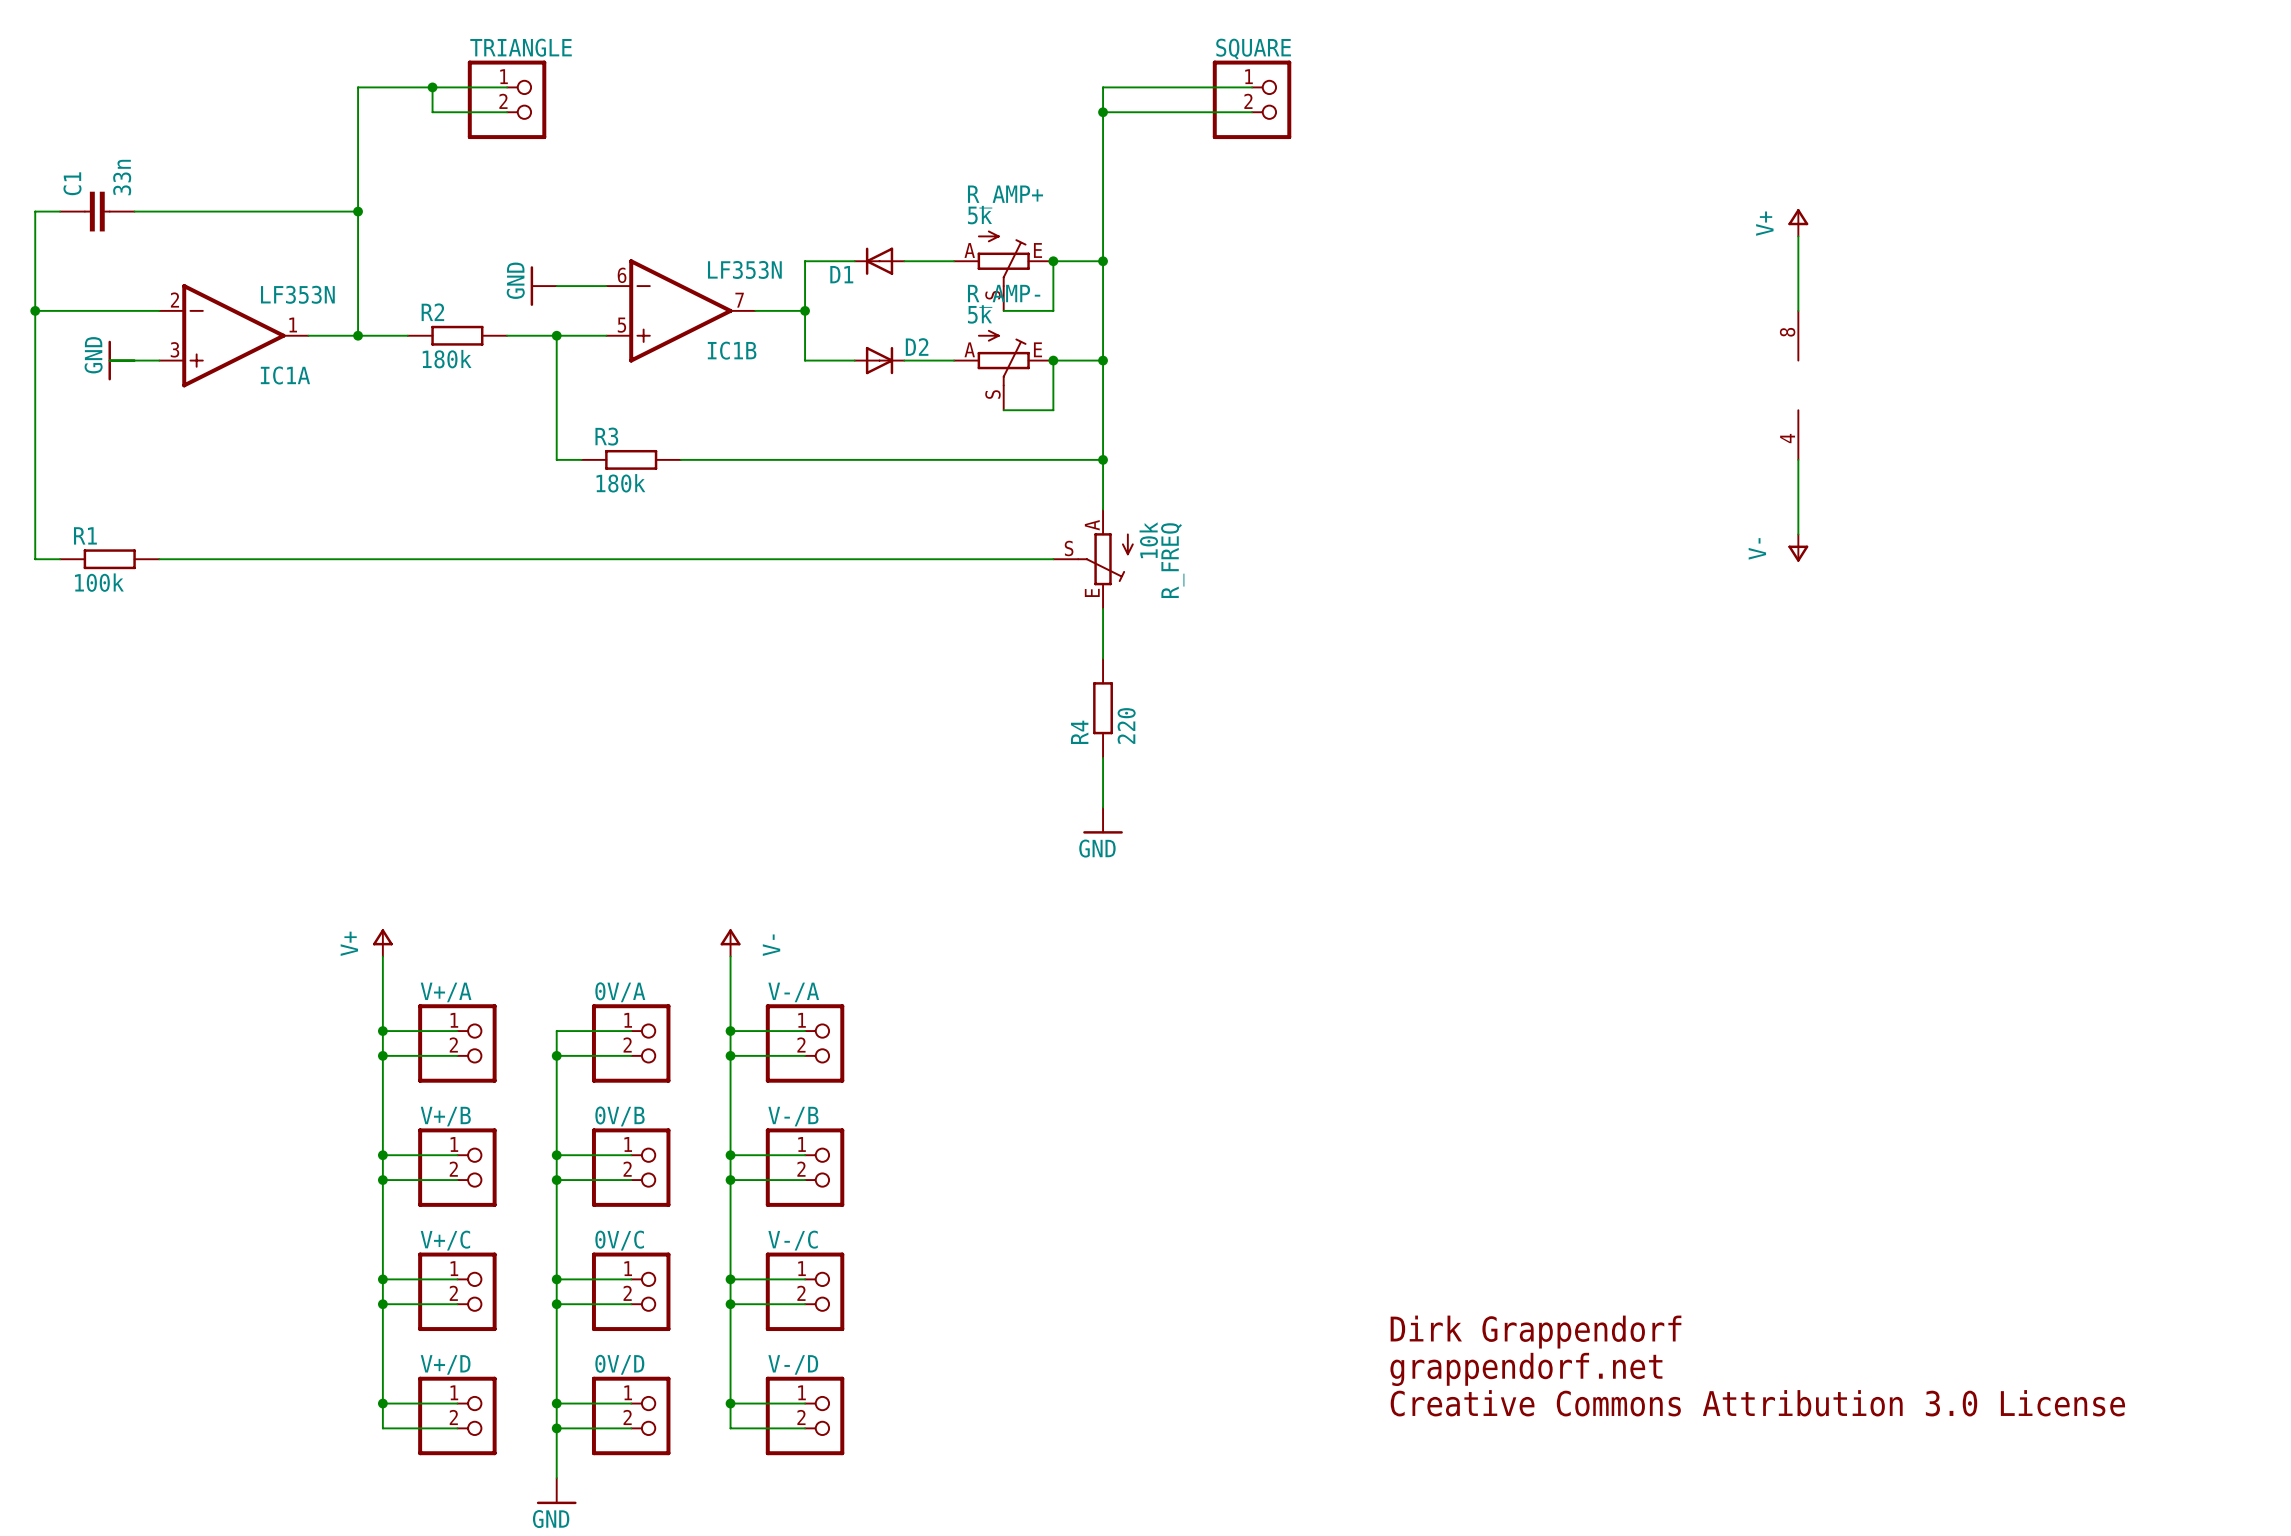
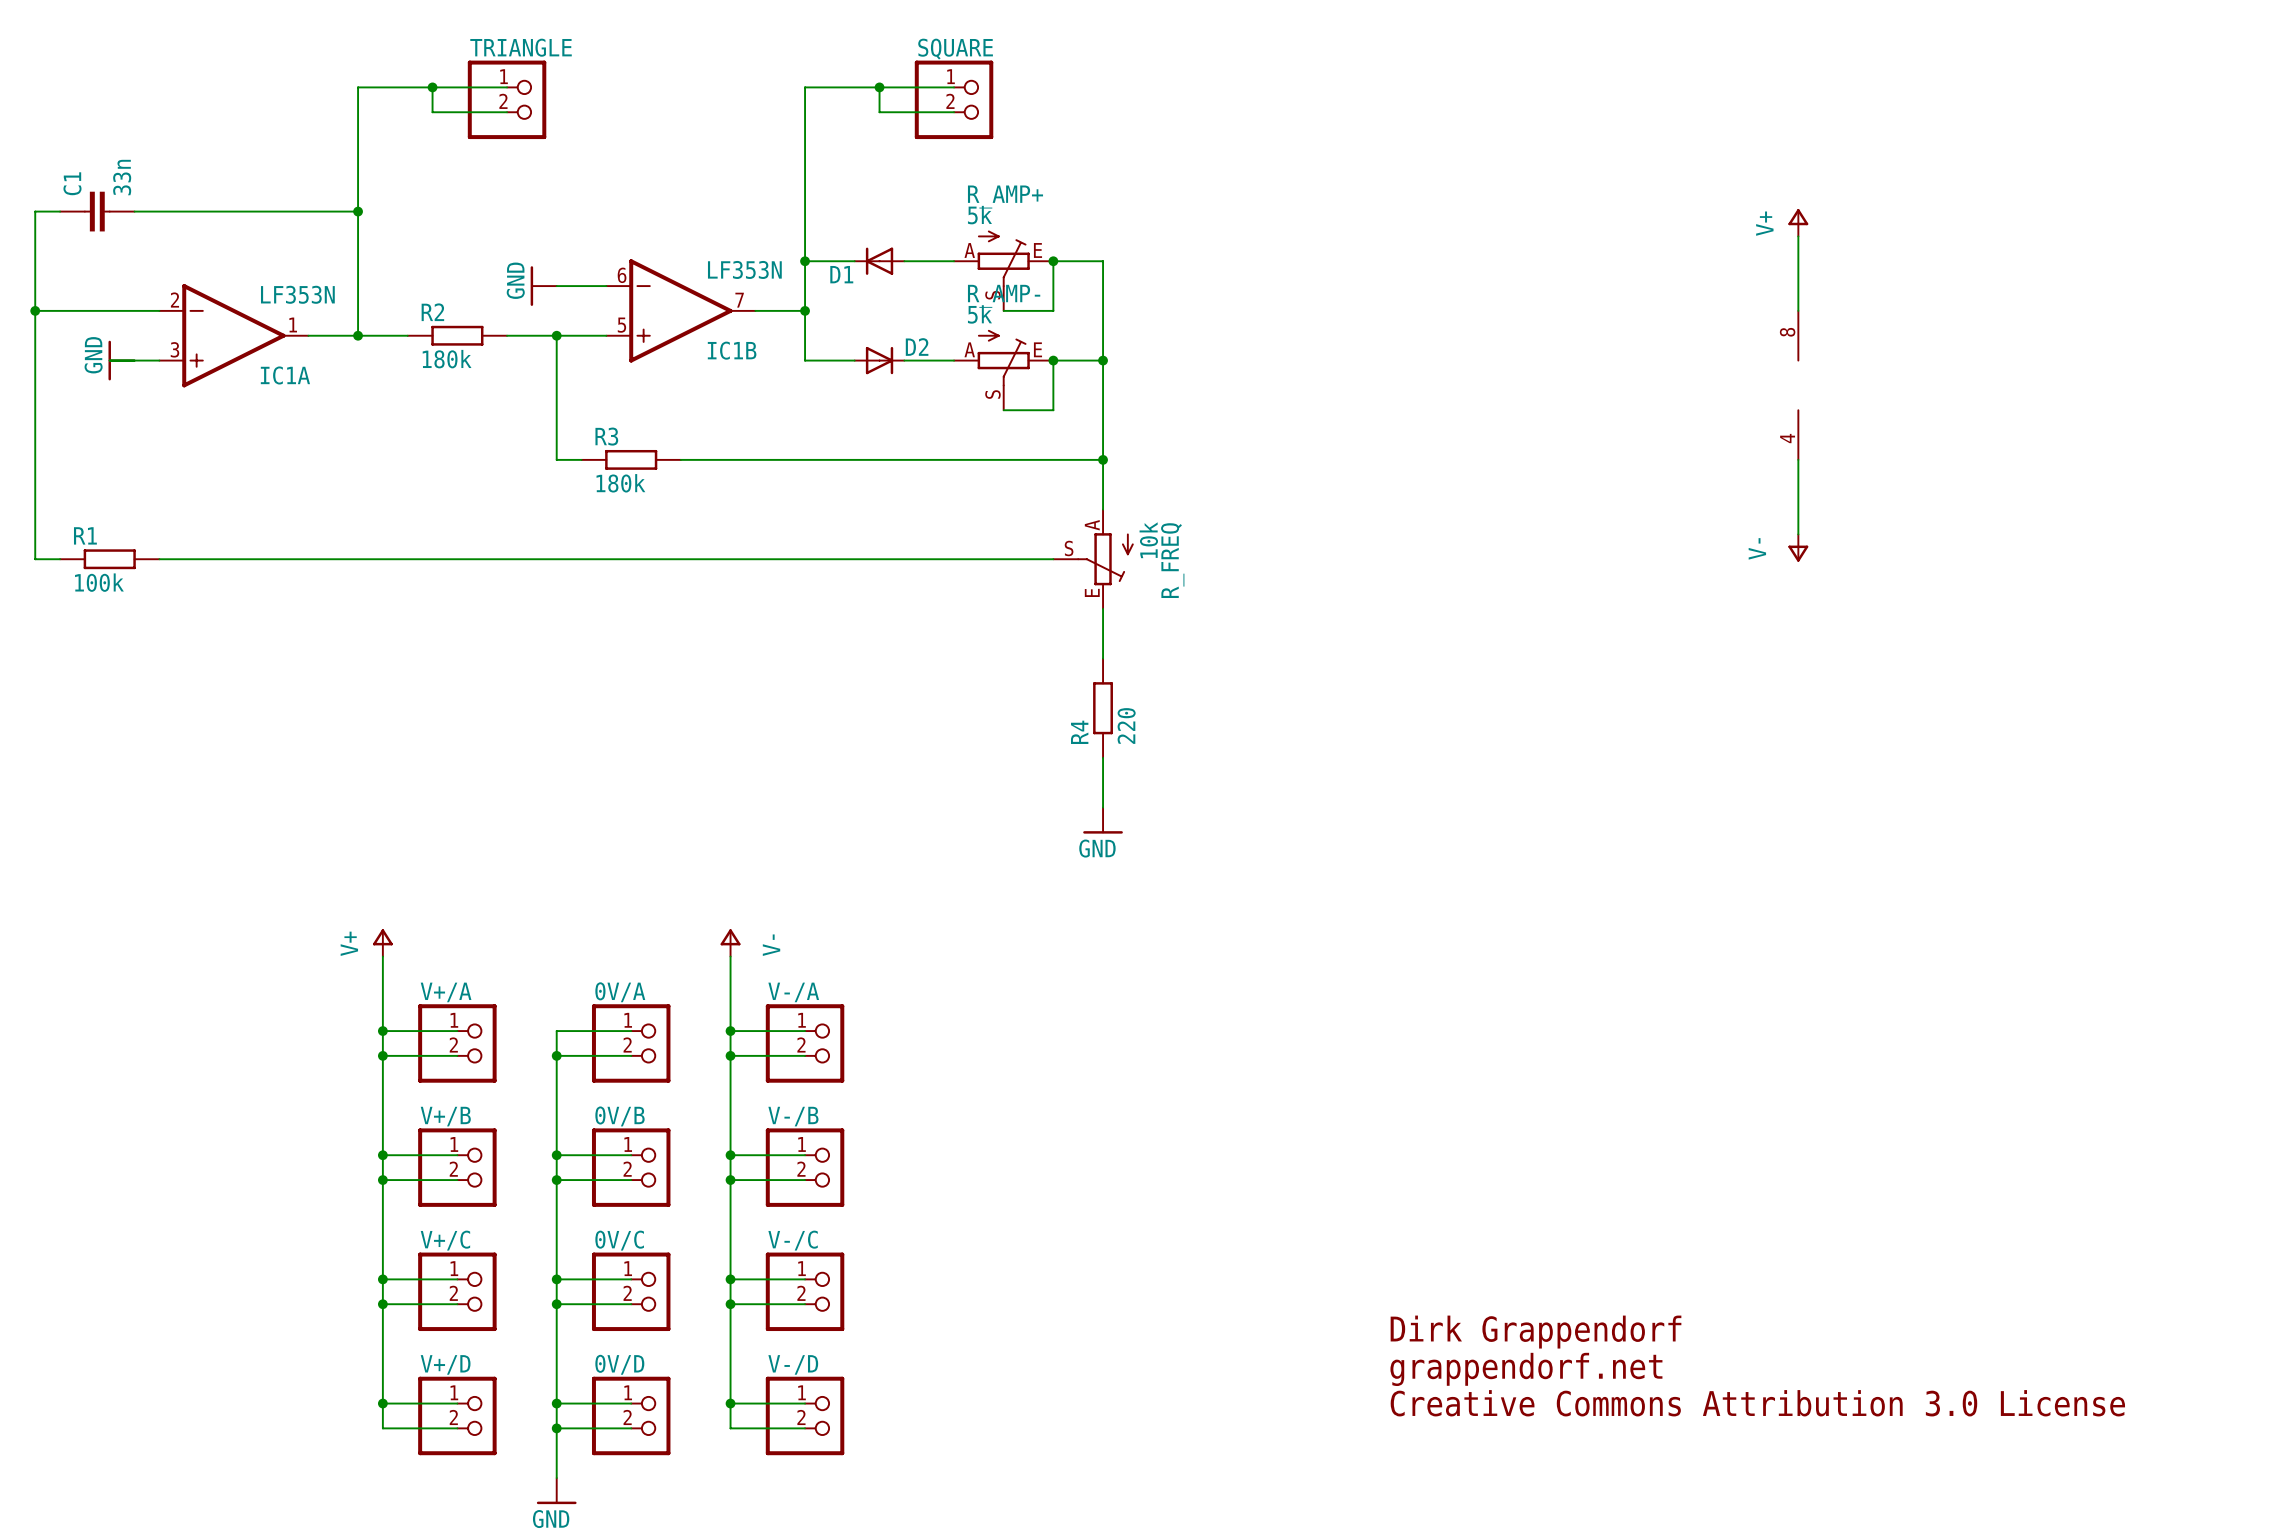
wire: none -> (879, 87) (879, 112) (954, 112)
junction: none -> (879, 87)
wire: none -> (954, 87) (805, 87) (805, 261)
wire: (1252, 87) (1103, 87) (1103, 261) -> none
SQUARE: none -> (954, 99)
SQUARE: (1252, 99) -> none
wire: (1103, 112) (1252, 112) -> none
junction: (1103, 112) -> none
junction: none -> (805, 261)
junction: (1103, 261) -> none

